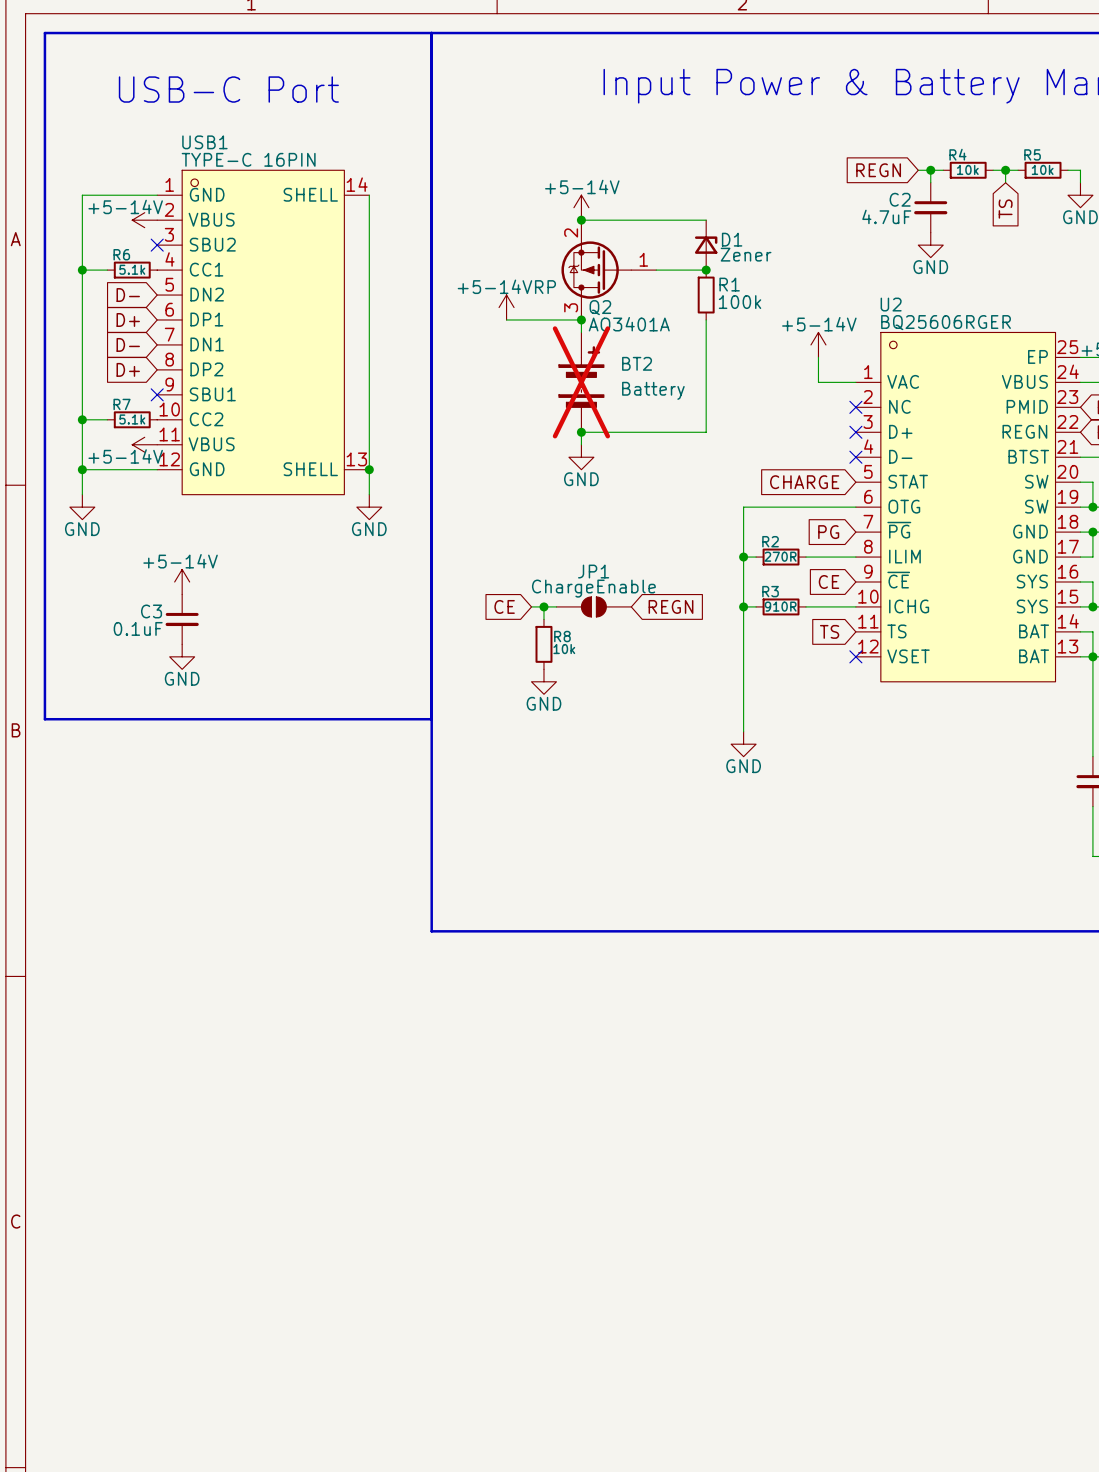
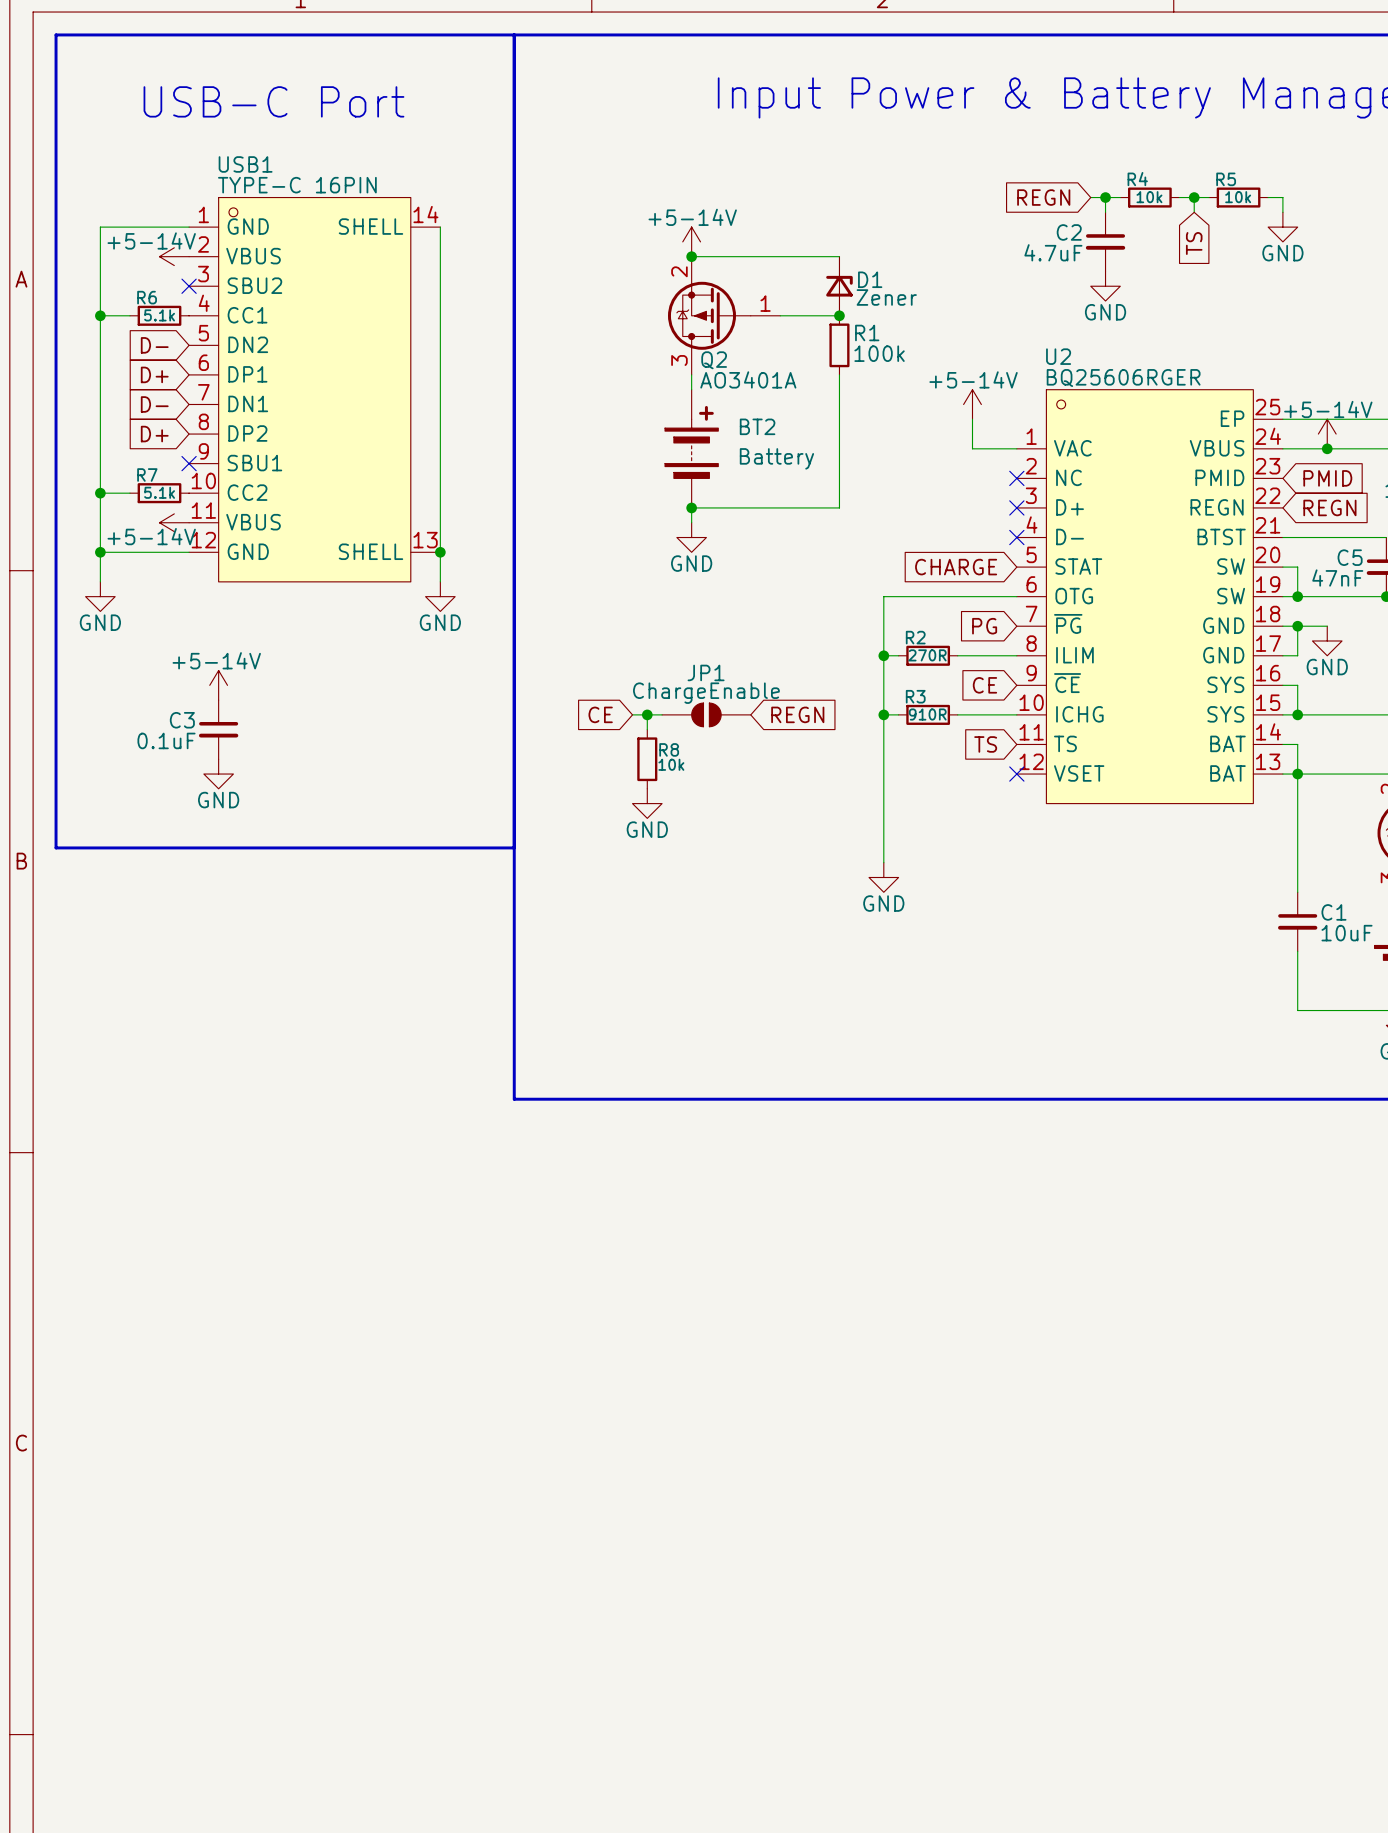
power symbol: +5-14VRP (506, 307) -> none
wire: (506, 319) (581, 319) -> none
junction: (581, 319) -> none
BT2 do-not-place cross: (581, 382) -> none

